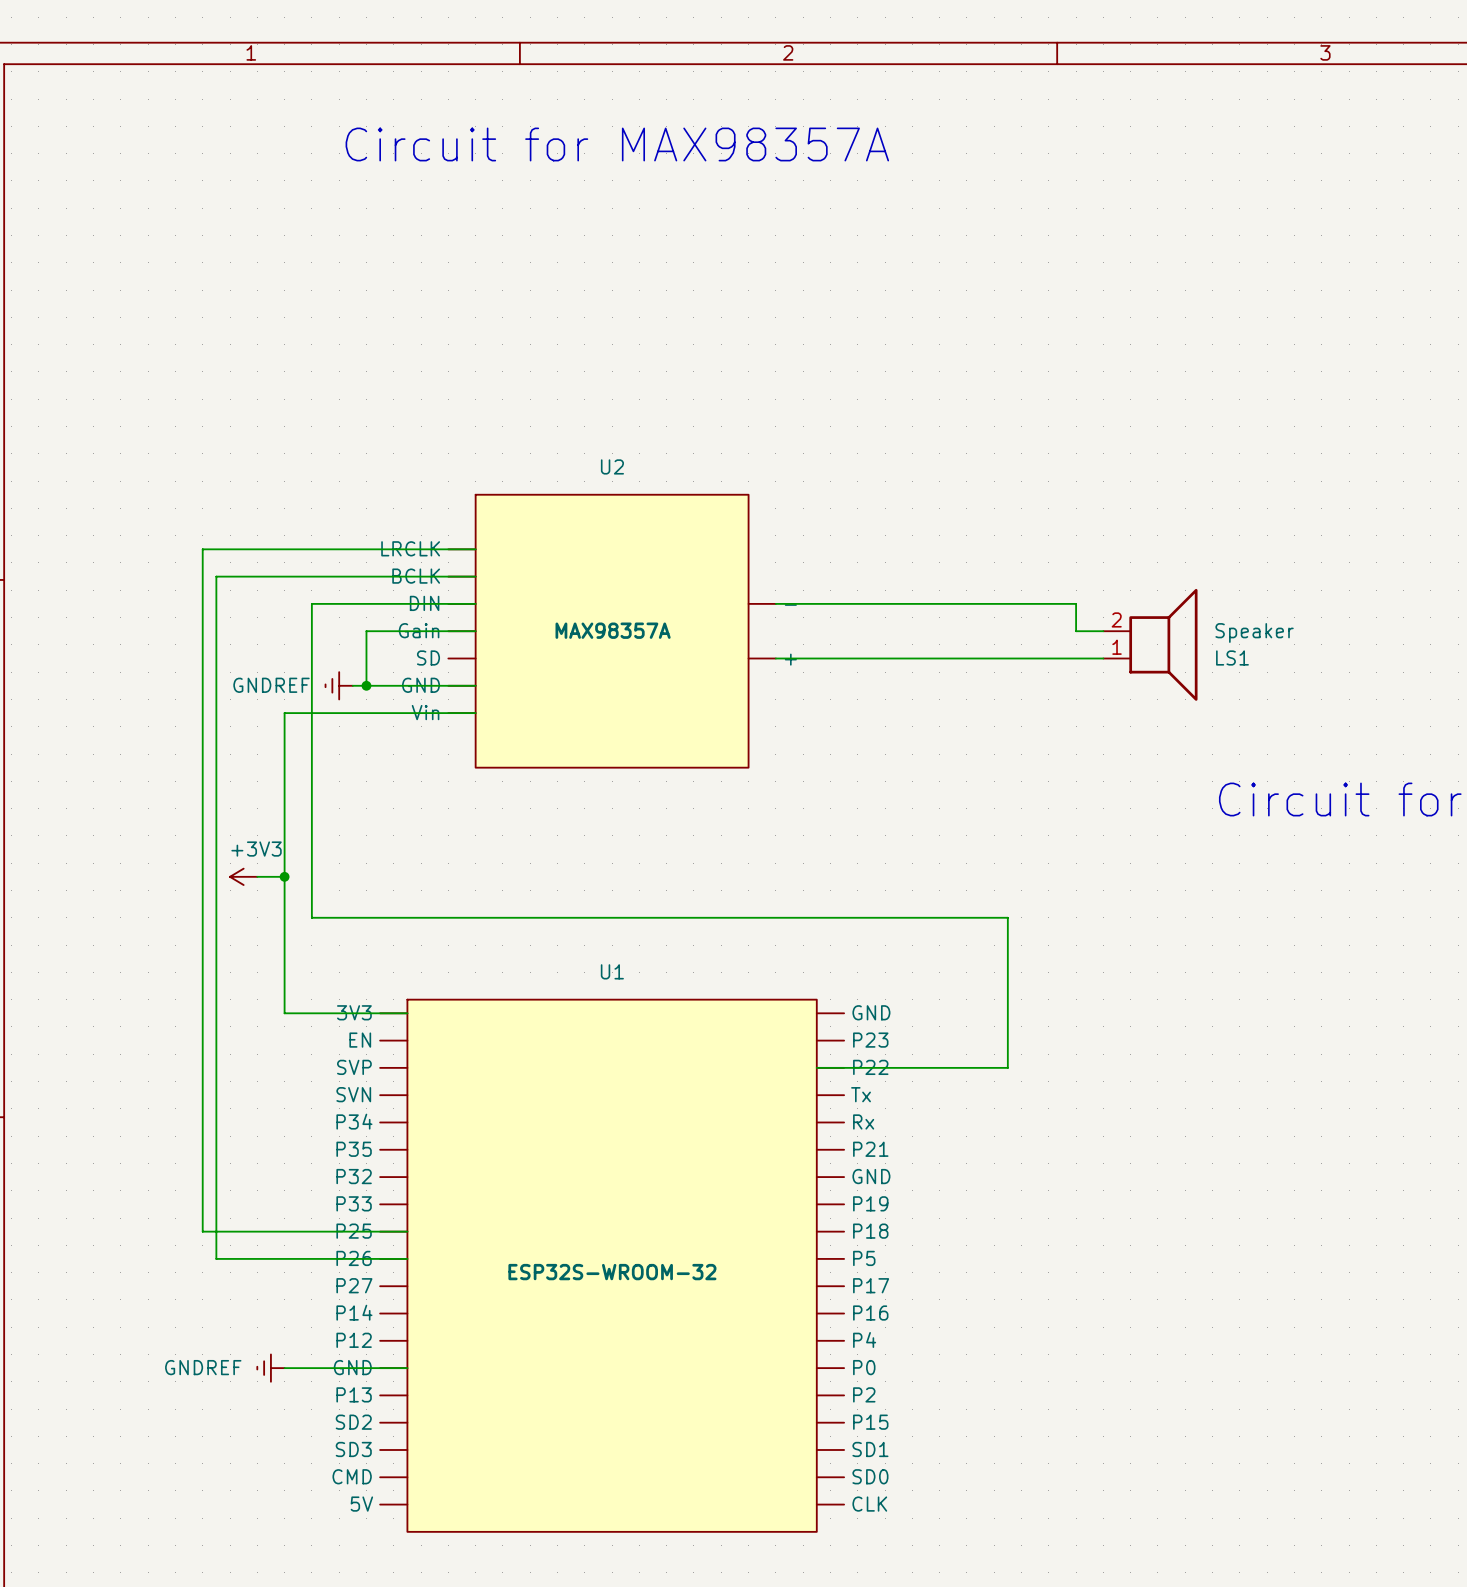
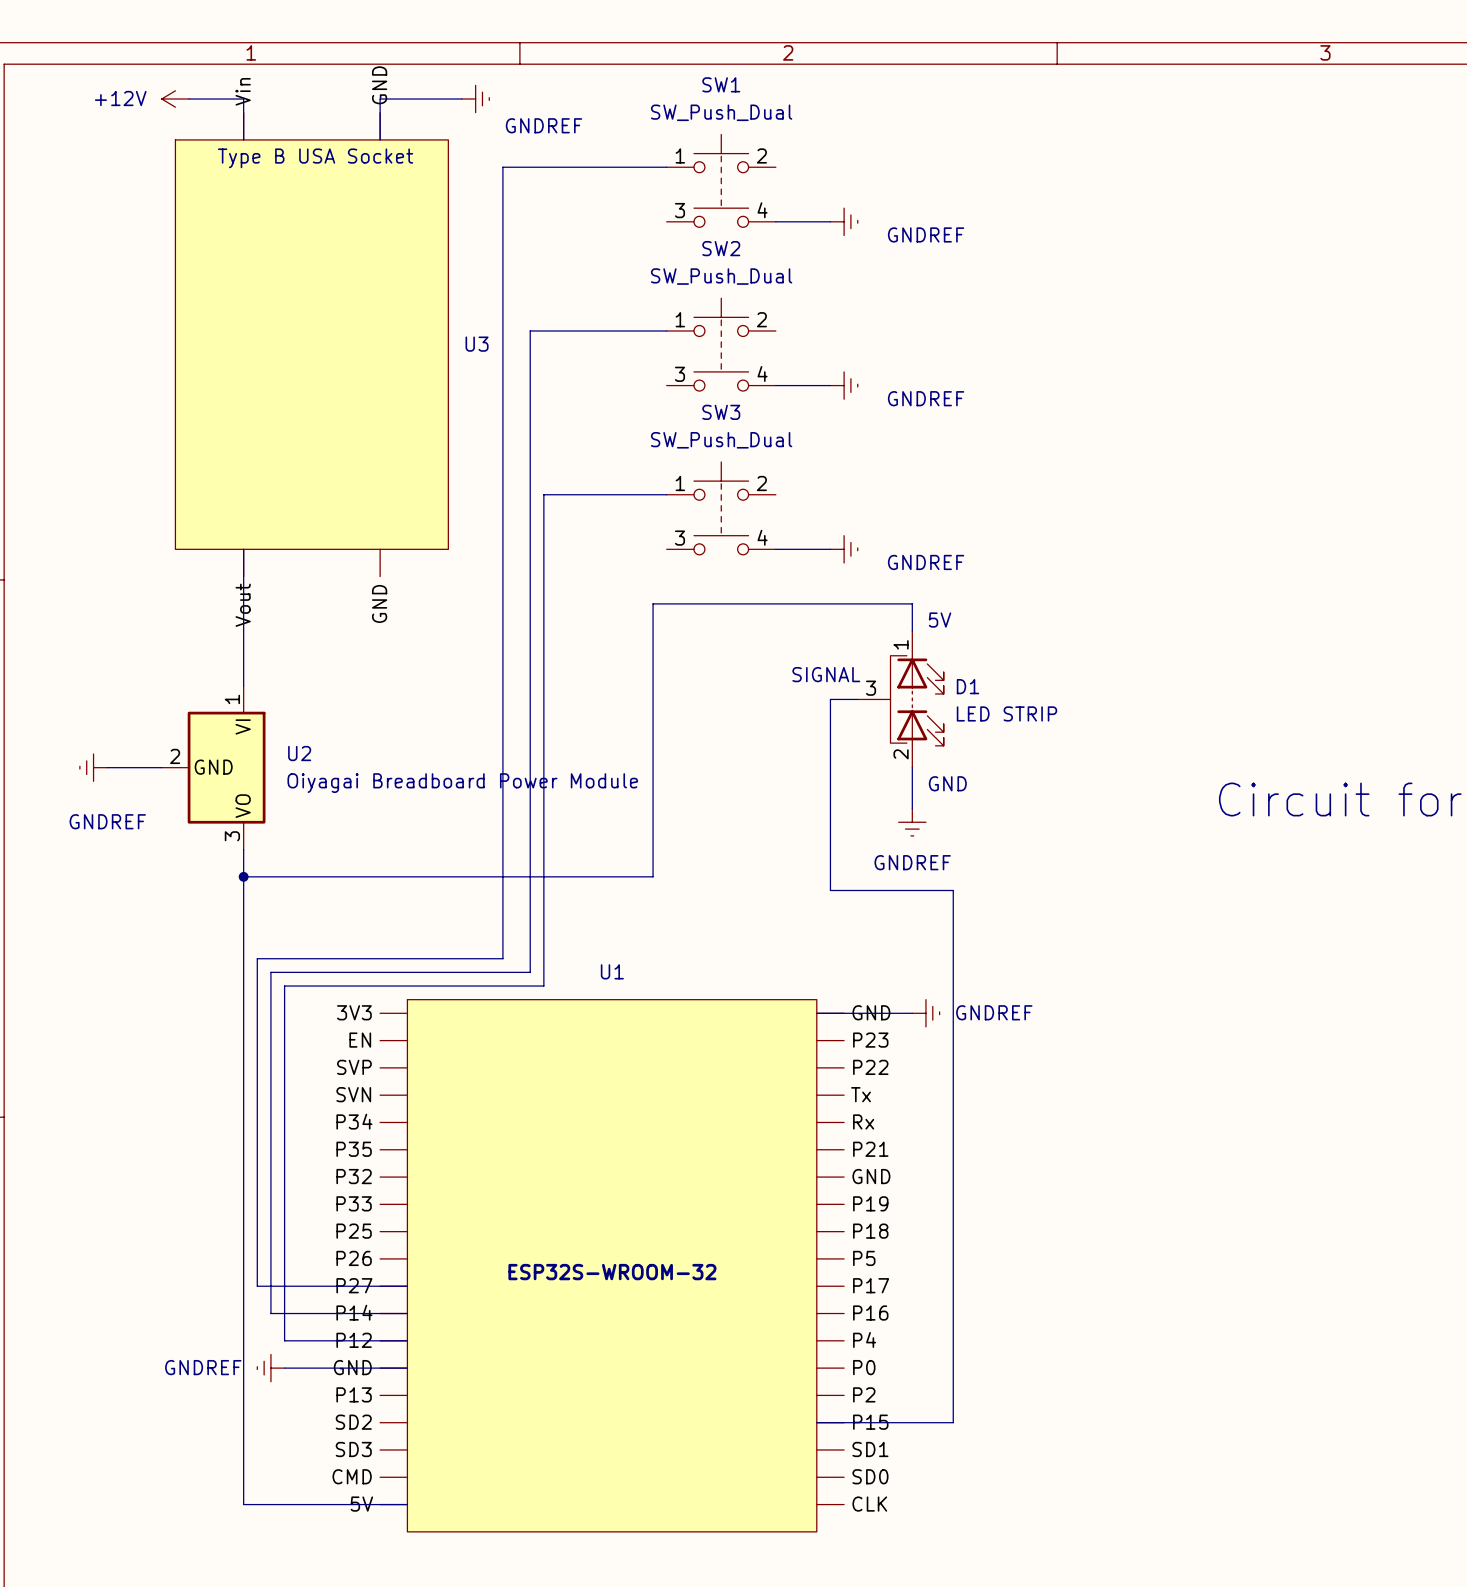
power symbol: none -> +12V (175, 99)
wire: none -> (189, 99) (243, 99) (243, 139)
wire: none -> (461, 99) (380, 99) (380, 139)
power symbol: none -> GNDREF (475, 99)
text: Circuit for MAX98357A (617, 144) -> none
text: none -> Type B USA Socket (315, 158)
wire: none -> (666, 167) (502, 167) (502, 958) (257, 958) (257, 1286) (407, 1286)
SW1: none -> SW_Push_Dual (721, 180)
wire: none -> (775, 221) (830, 221)
power symbol: none -> GNDREF (844, 221)
wire: none -> (666, 330) (530, 330) (530, 972) (270, 972) (270, 1313) (407, 1313)
U3: none -> (311, 344)
SW2: none -> SW_Push_Dual (721, 344)
wire: none -> (775, 385) (830, 385)
power symbol: none -> GNDREF (844, 385)
U2 name position: U2 (612, 466) -> U2 (299, 753)
U2 symbol: [448, 494, 776, 768] -> [161, 685, 266, 850]
SW3: none -> SW_Push_Dual (721, 508)
wire: none -> (243, 549) (243, 685)
wire: (475, 549) (202, 549) (202, 1231) (407, 1231) -> none
wire: none -> (775, 549) (830, 549)
power symbol: none -> GNDREF (844, 549)
wire: (475, 576) (216, 576) (216, 1258) (407, 1258) -> none
wire: (475, 603) (311, 603) (311, 917) (1007, 917) (1007, 1067) (816, 1067) -> none
wire: none -> (775, 603) (653, 603) (653, 876) (284, 876)
wire: (912, 603) (1076, 603) (1076, 631) (1103, 631) -> (912, 603) (912, 631)
text: none -> 5V (940, 620)
U2 value: MAX98357A (613, 630) -> Oiyagai Breadboard Power Module (462, 783)
wire: (475, 631) (366, 631) (366, 685) -> none
LS1: Speaker (1150, 644) -> none
wire: (775, 658) (1103, 658) -> none
text: none -> SIGNAL (826, 674)
power symbol text position: GNDREF (271, 685) -> GNDREF (107, 821)
power symbol position: GNDREF (339, 685) -> GNDREF (93, 767)
wire: (352, 685) (475, 685) -> none
junction: (366, 685) -> none
wire: none -> (857, 699) (830, 699) (830, 890) (953, 890) (953, 1422) (816, 1422)
D1: none -> LED STRIP (900, 699)
wire: (475, 713) (284, 713) (284, 986) -> (666, 494) (543, 494) (543, 986) (284, 986)
wire: none -> (107, 767) (161, 767)
wire: none -> (912, 767) (912, 808)
text: none -> GND (947, 783)
power symbol: none -> GNDREF (912, 822)
wire: none -> (243, 849) (243, 1504) (407, 1504)
power symbol: +3V3 (243, 876) -> none
junction position: (284, 876) -> (243, 876)
wire: (284, 1013) (407, 1013) -> (284, 1013) (284, 1340) (407, 1340)
wire: none -> (816, 1013) (912, 1013)
power symbol: none -> GNDREF (925, 1013)

